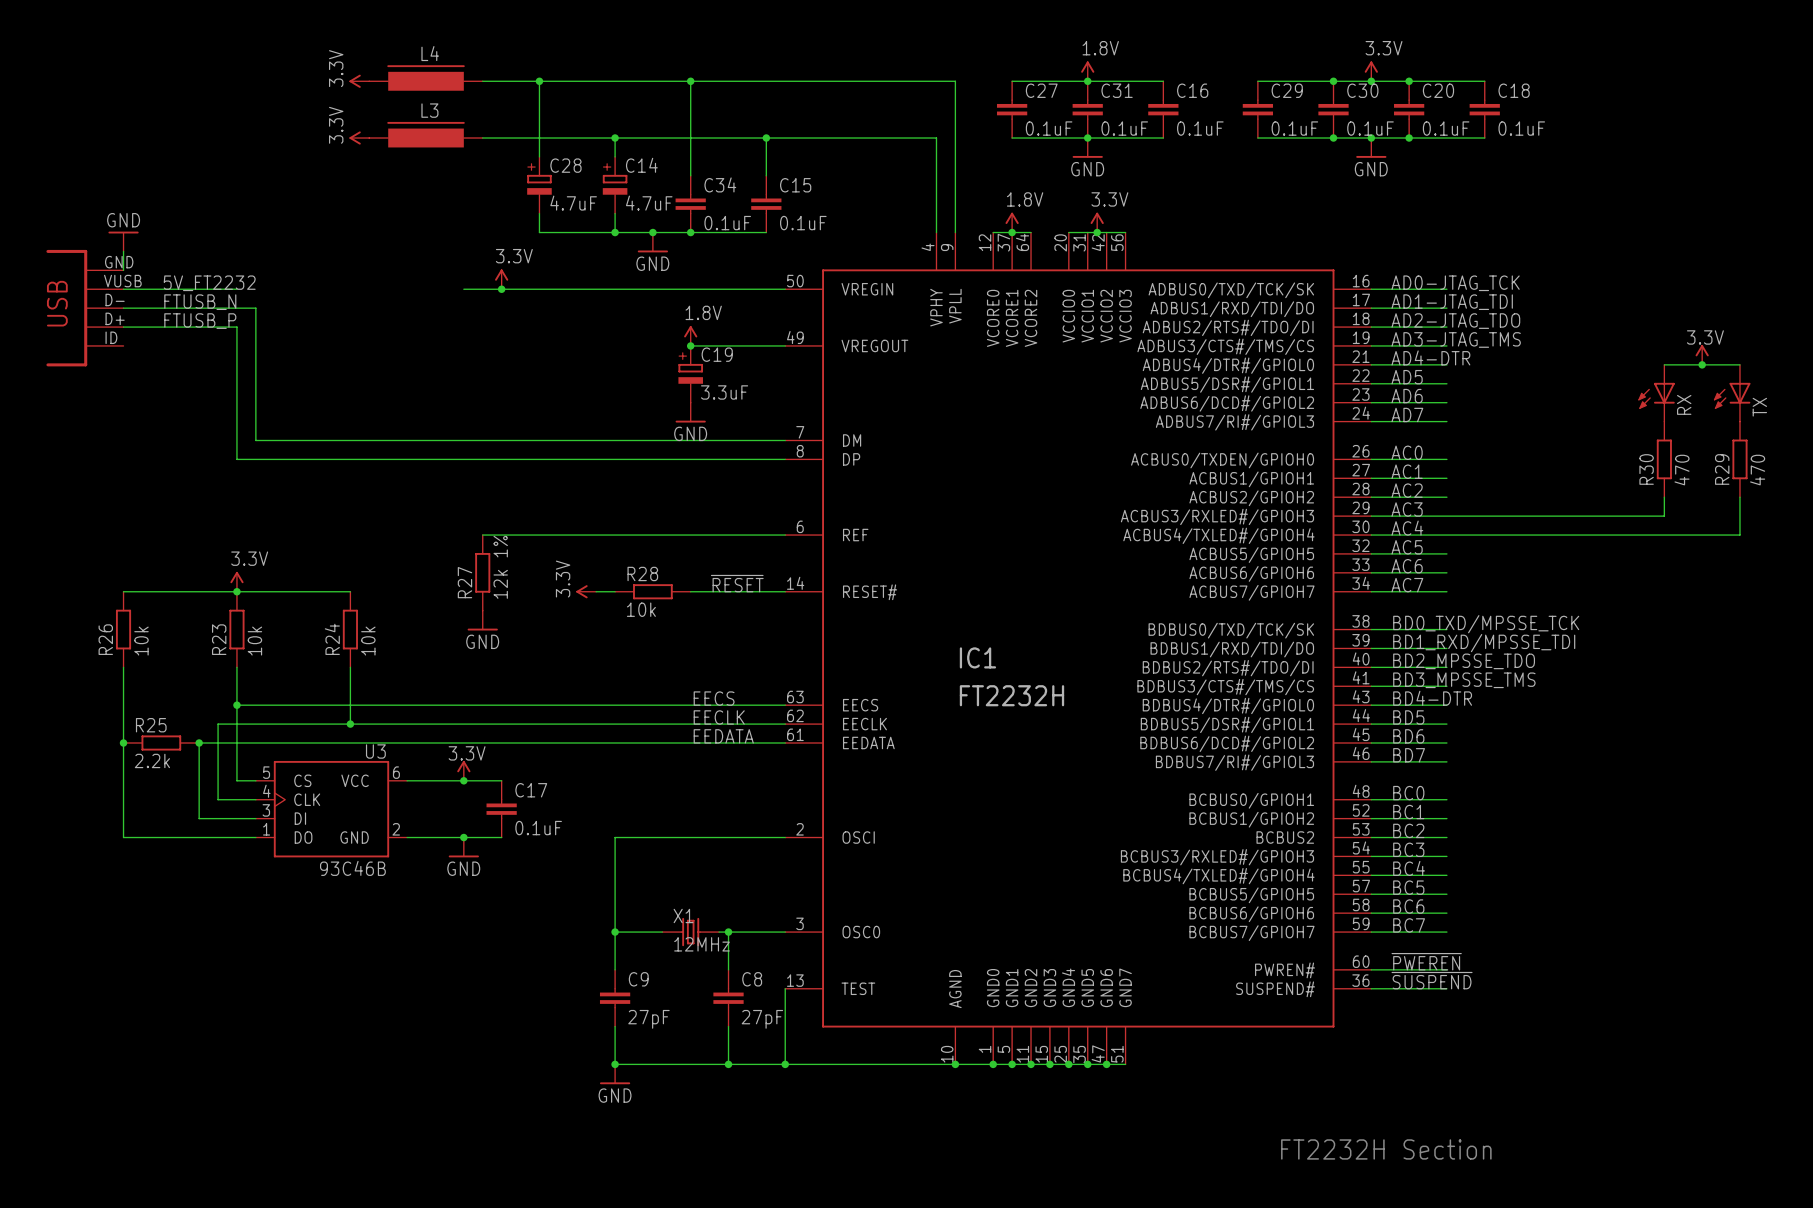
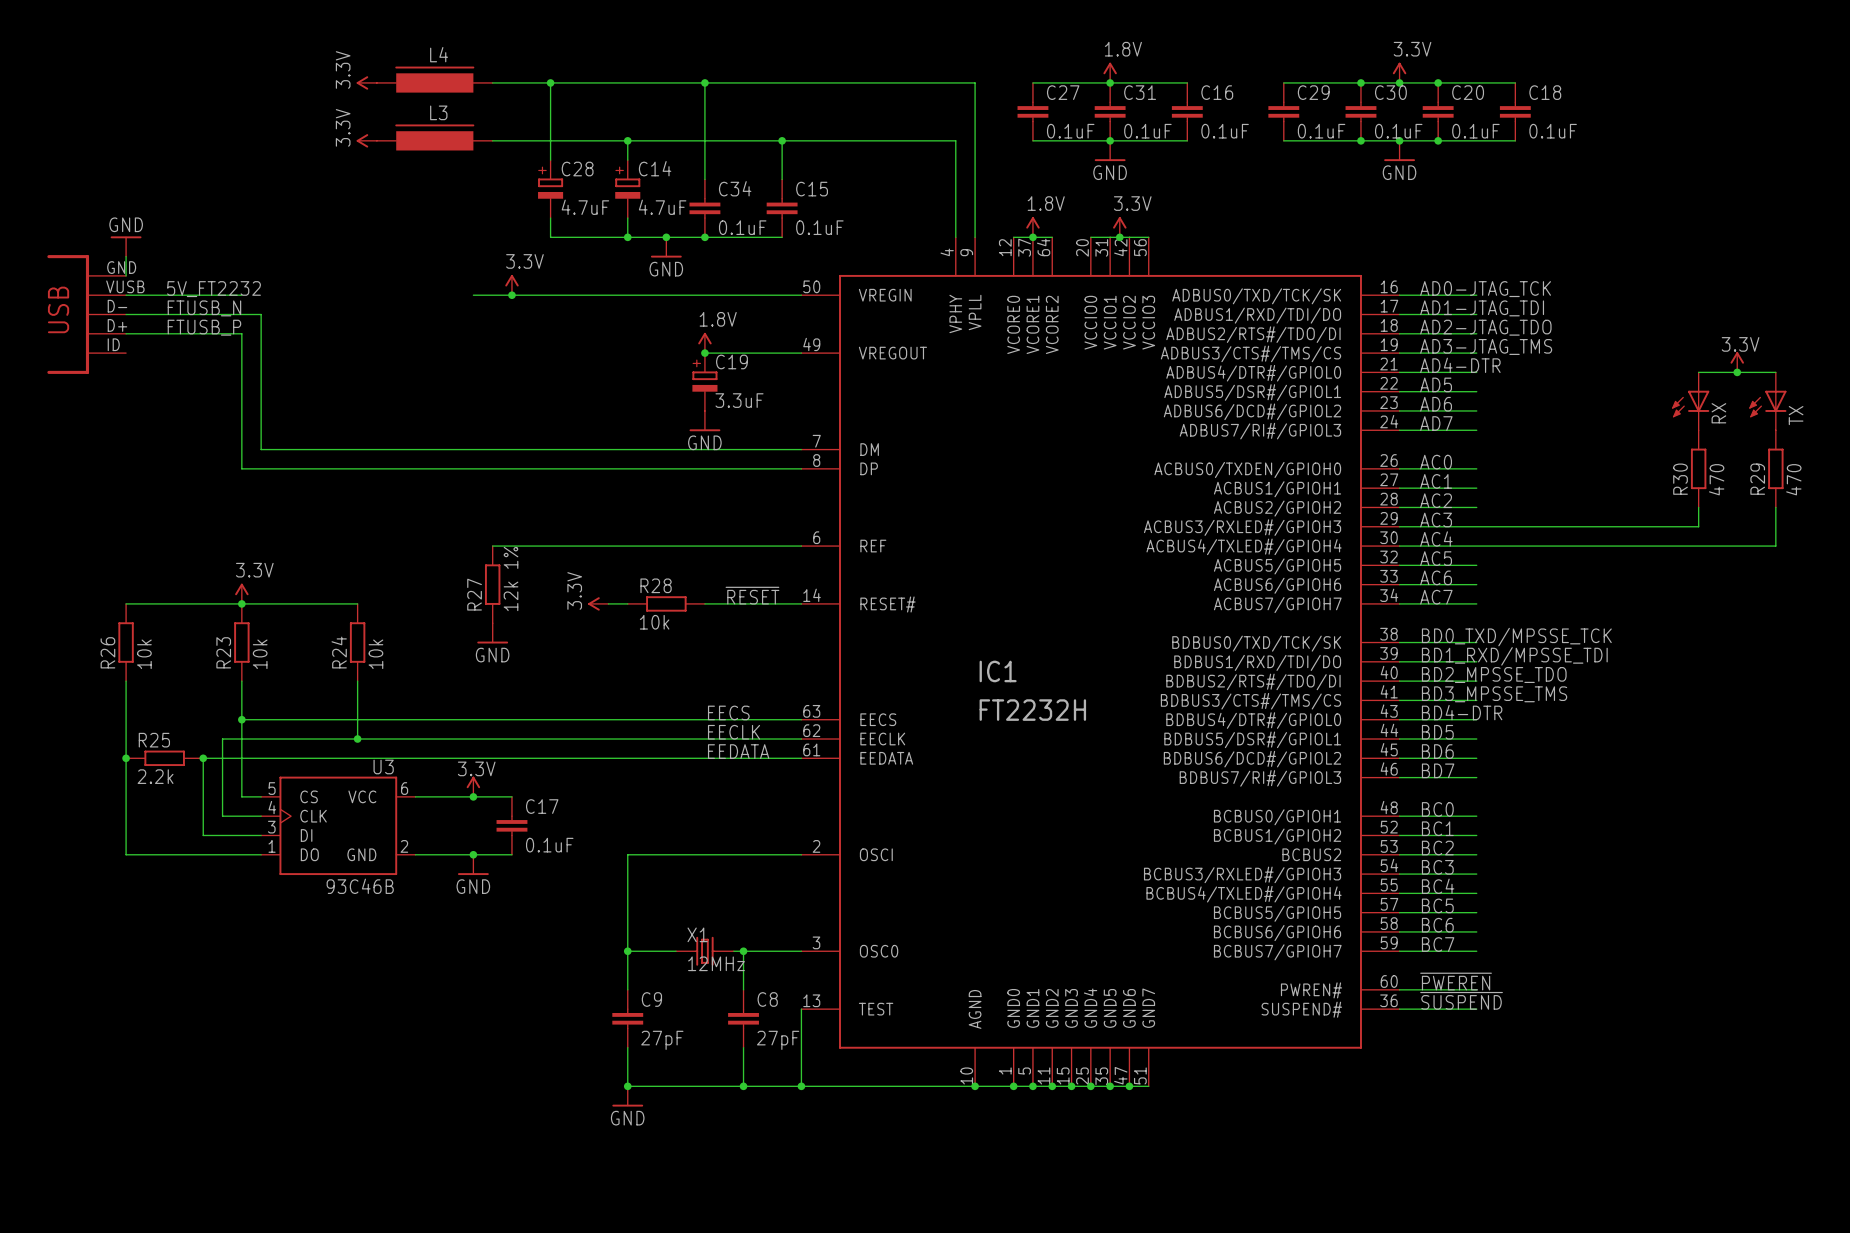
text: FT2232H Section (1386, 1149) -> none

